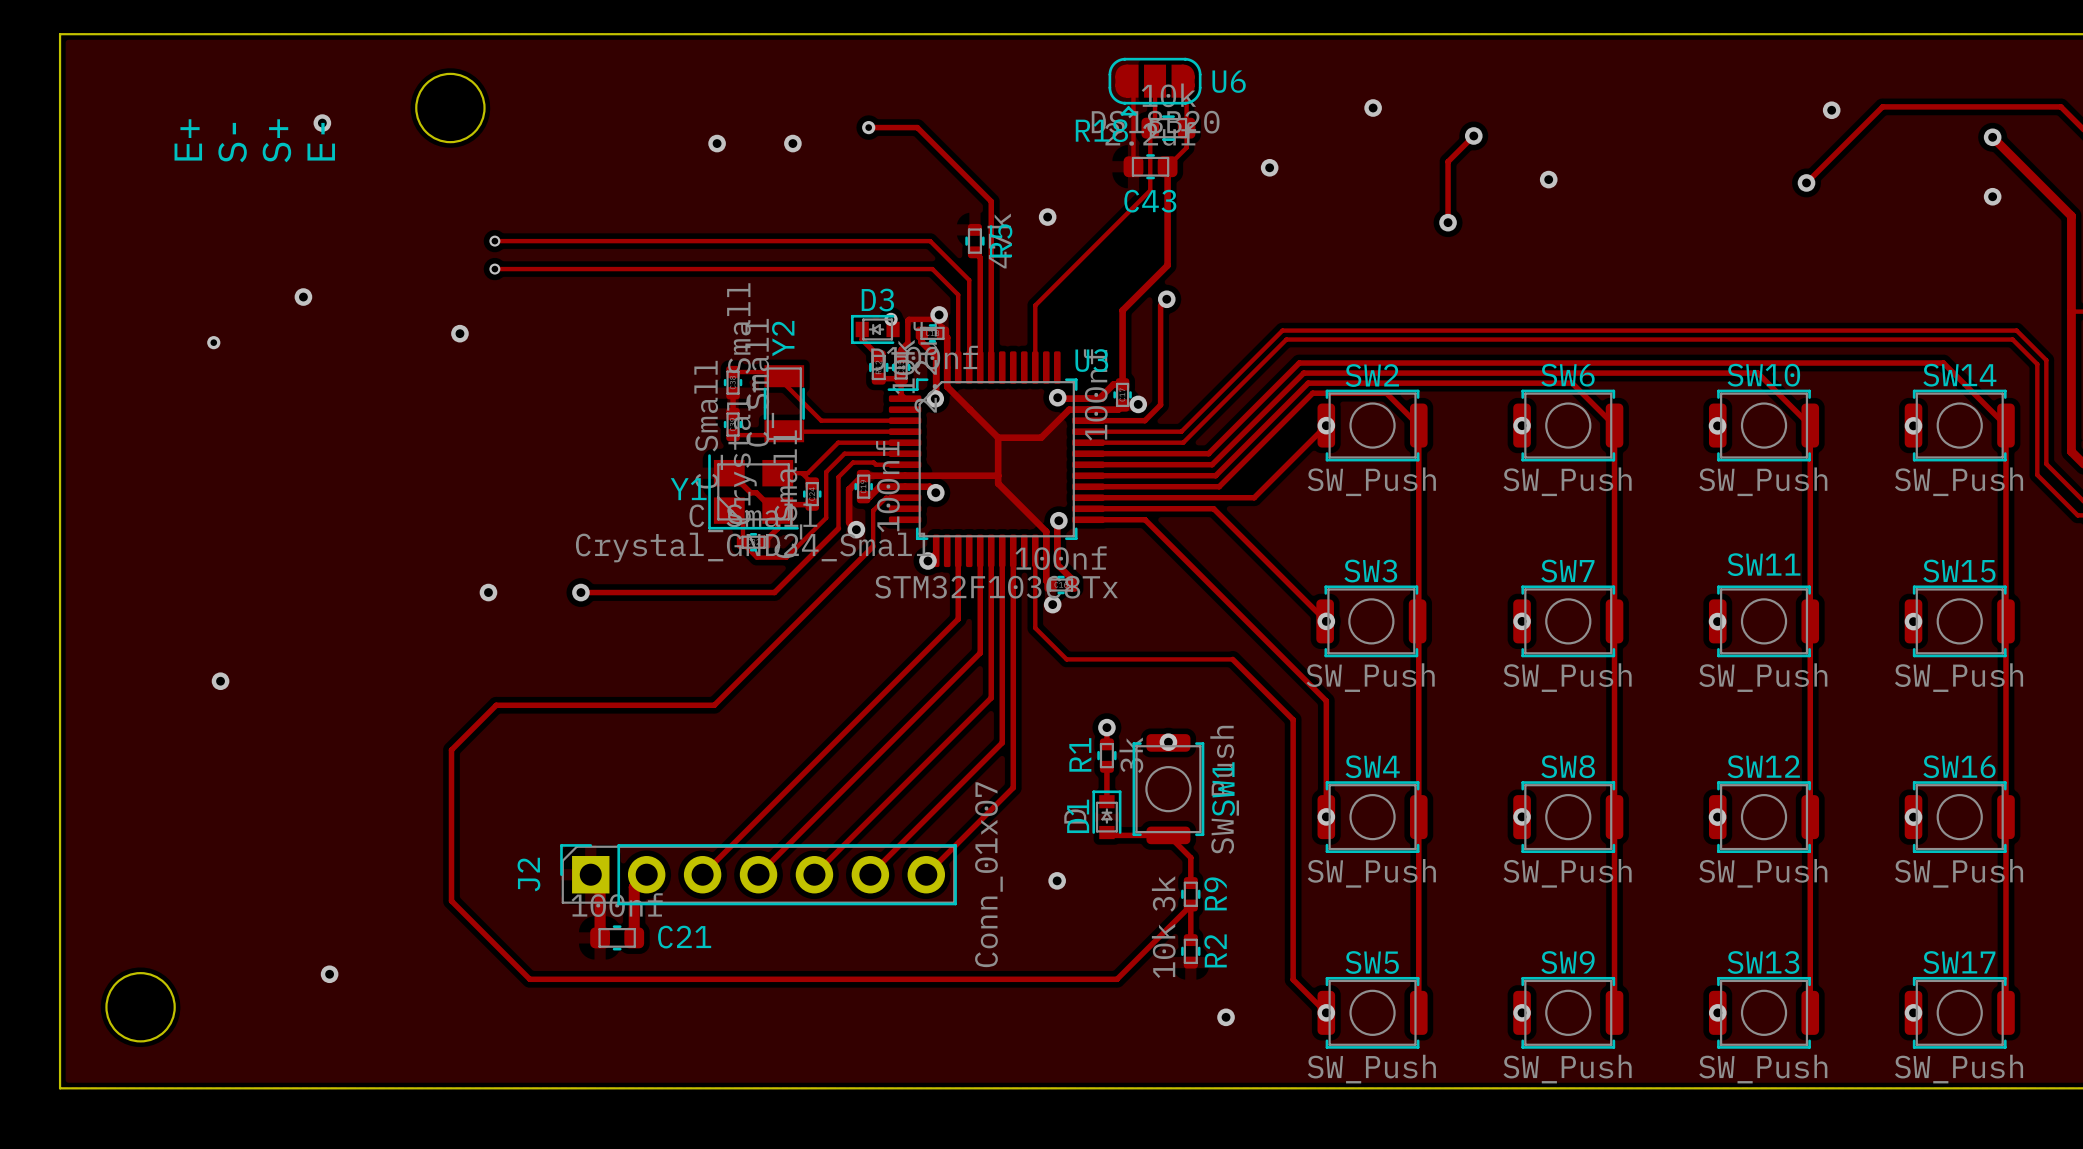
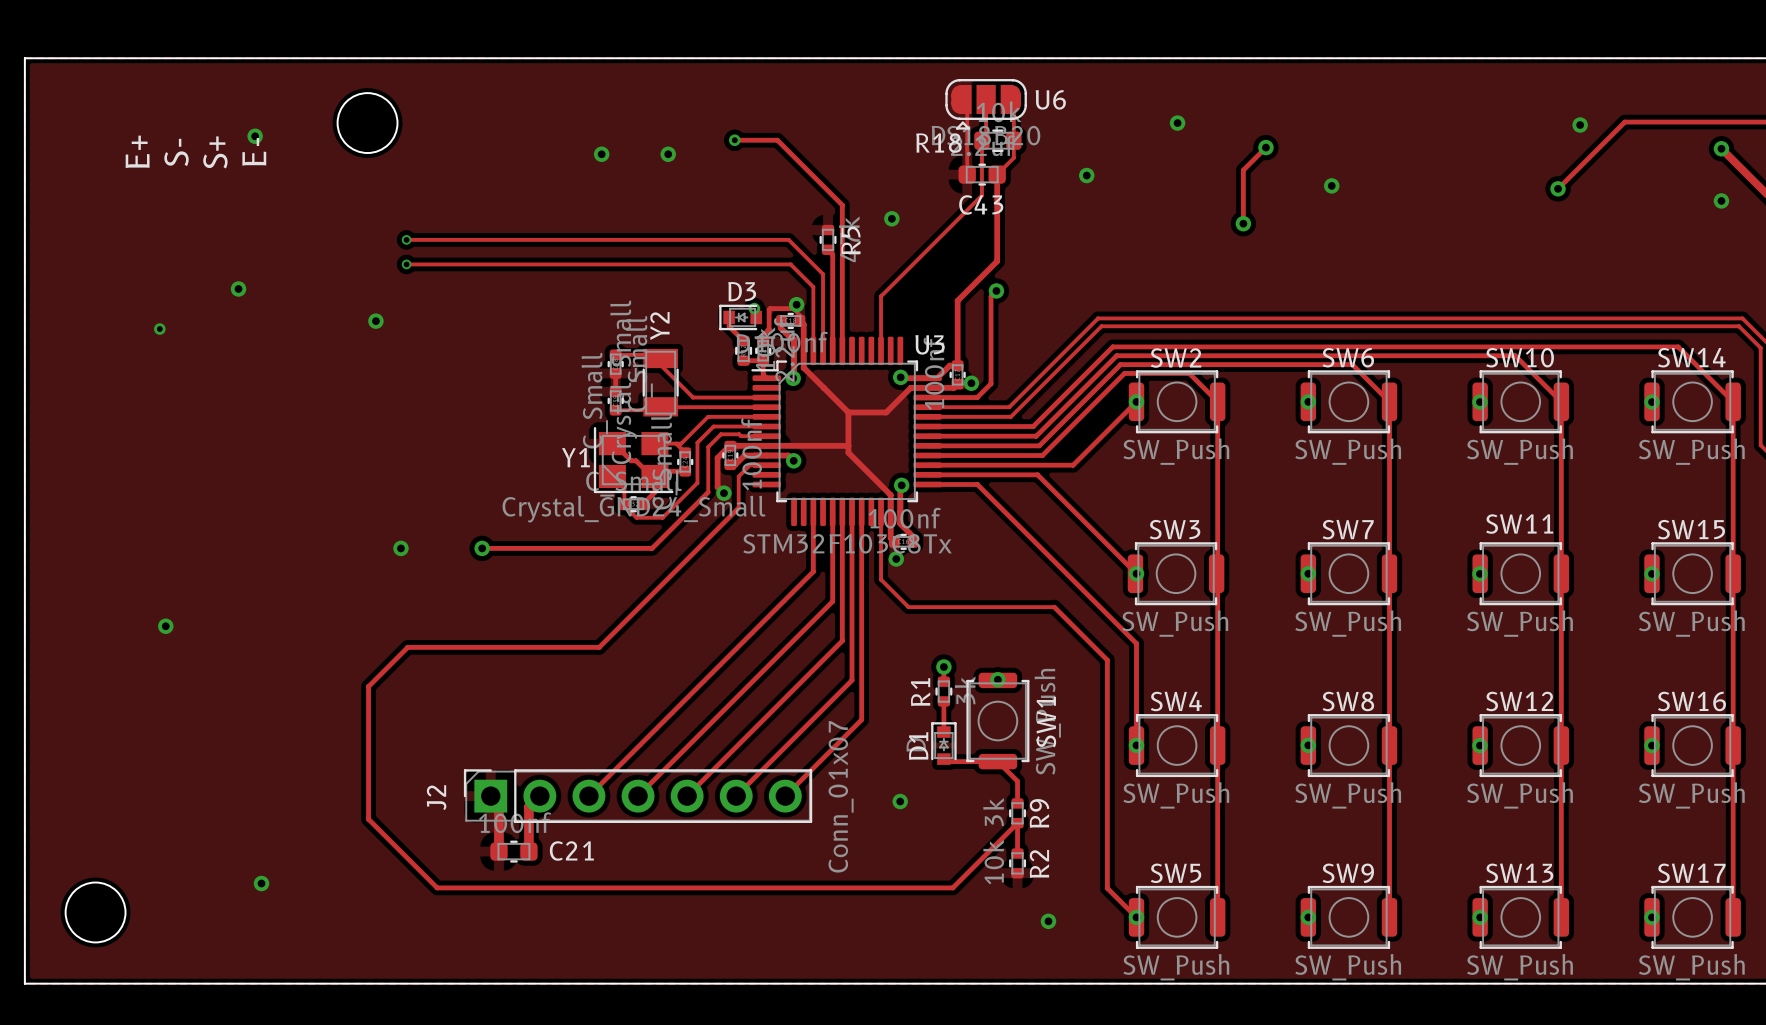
via: (927, 560) -> none

